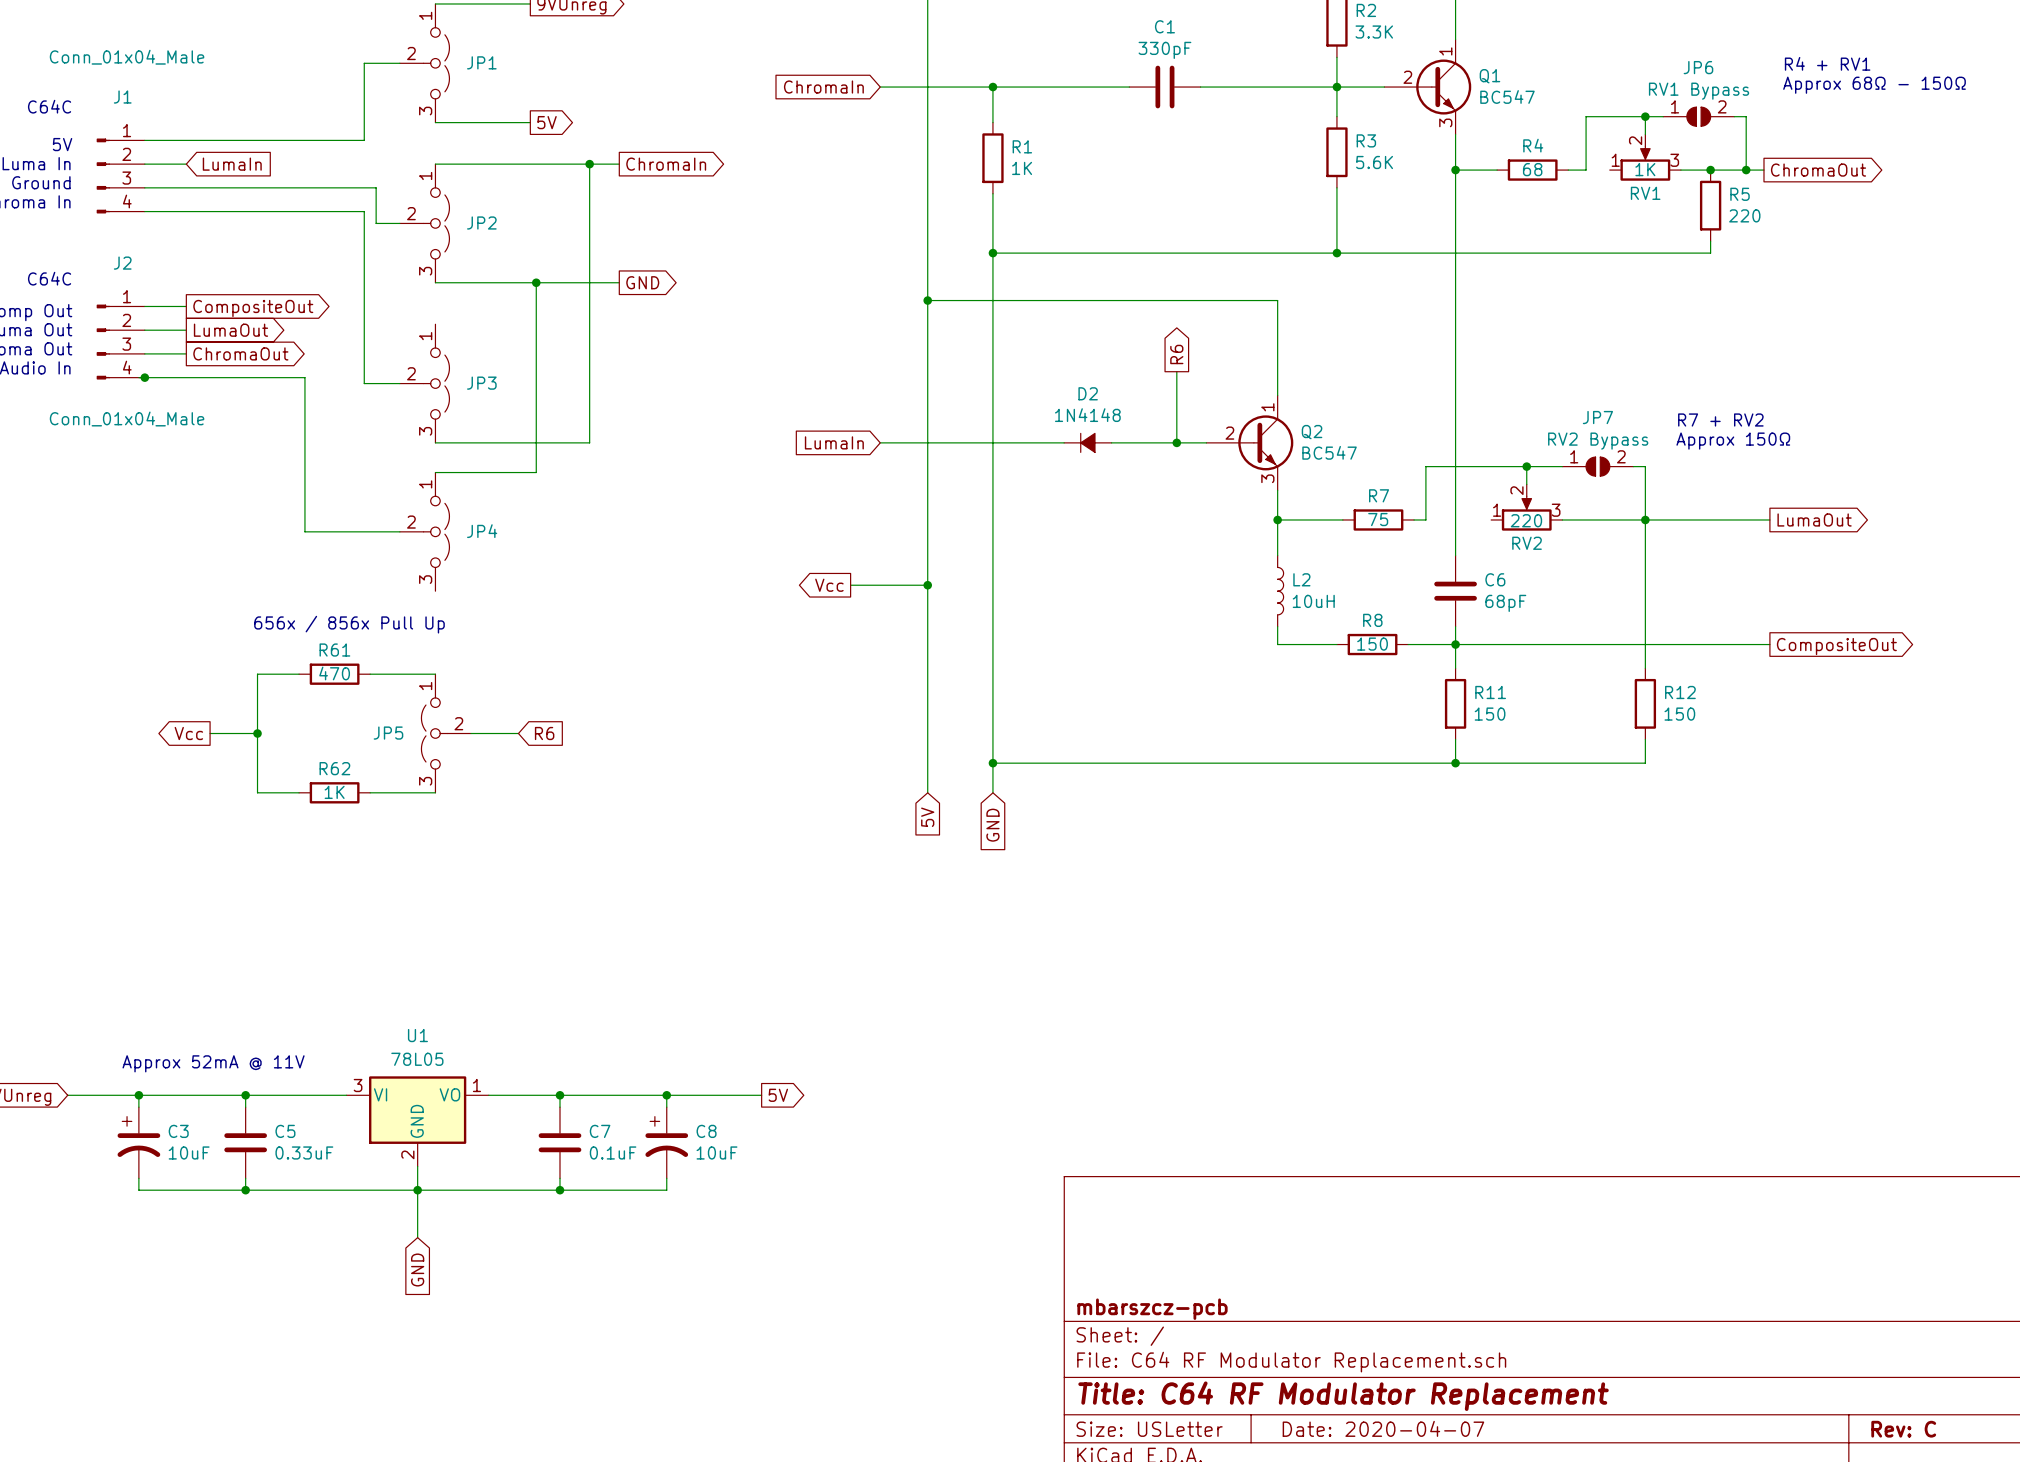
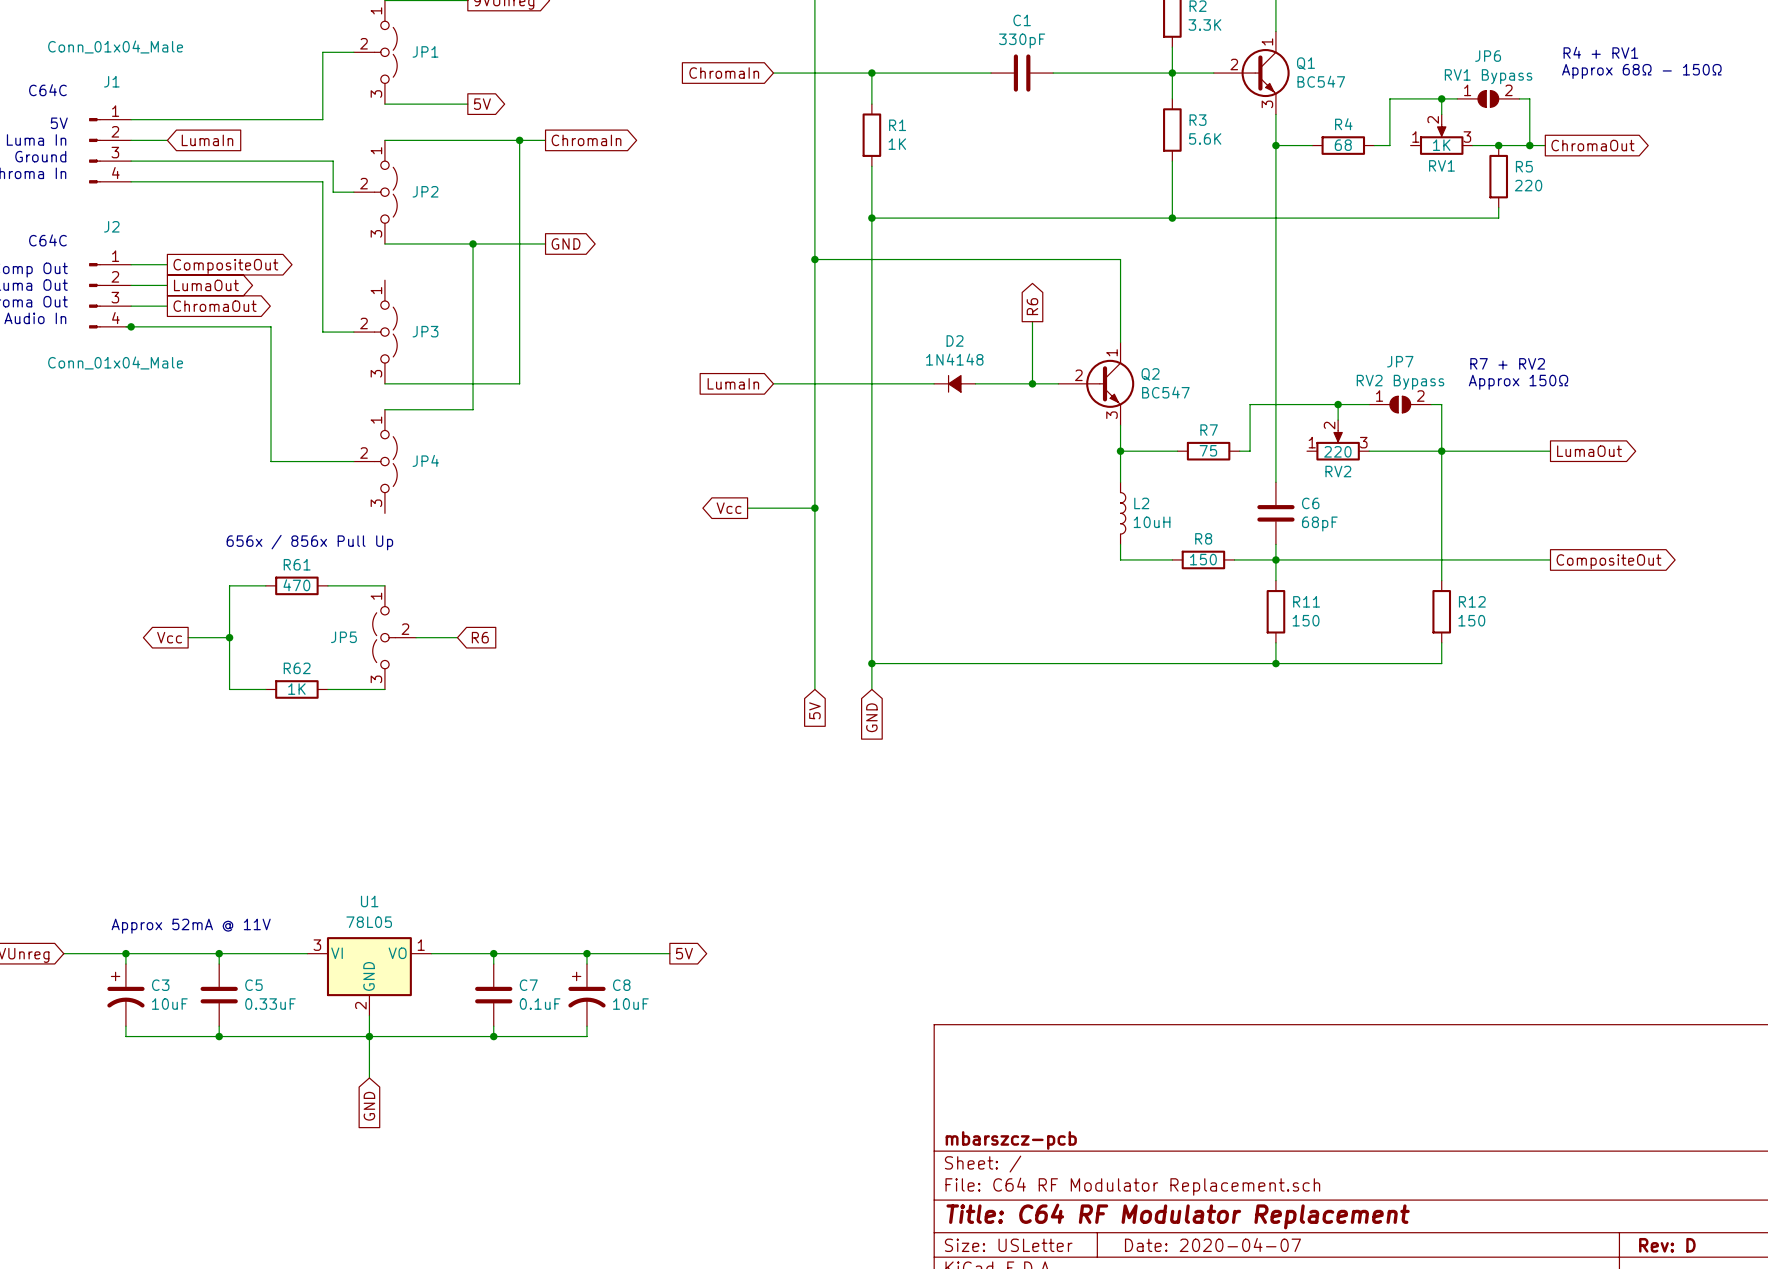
title block: Rev: C (1903, 1429) -> Rev: D (1667, 1245)

